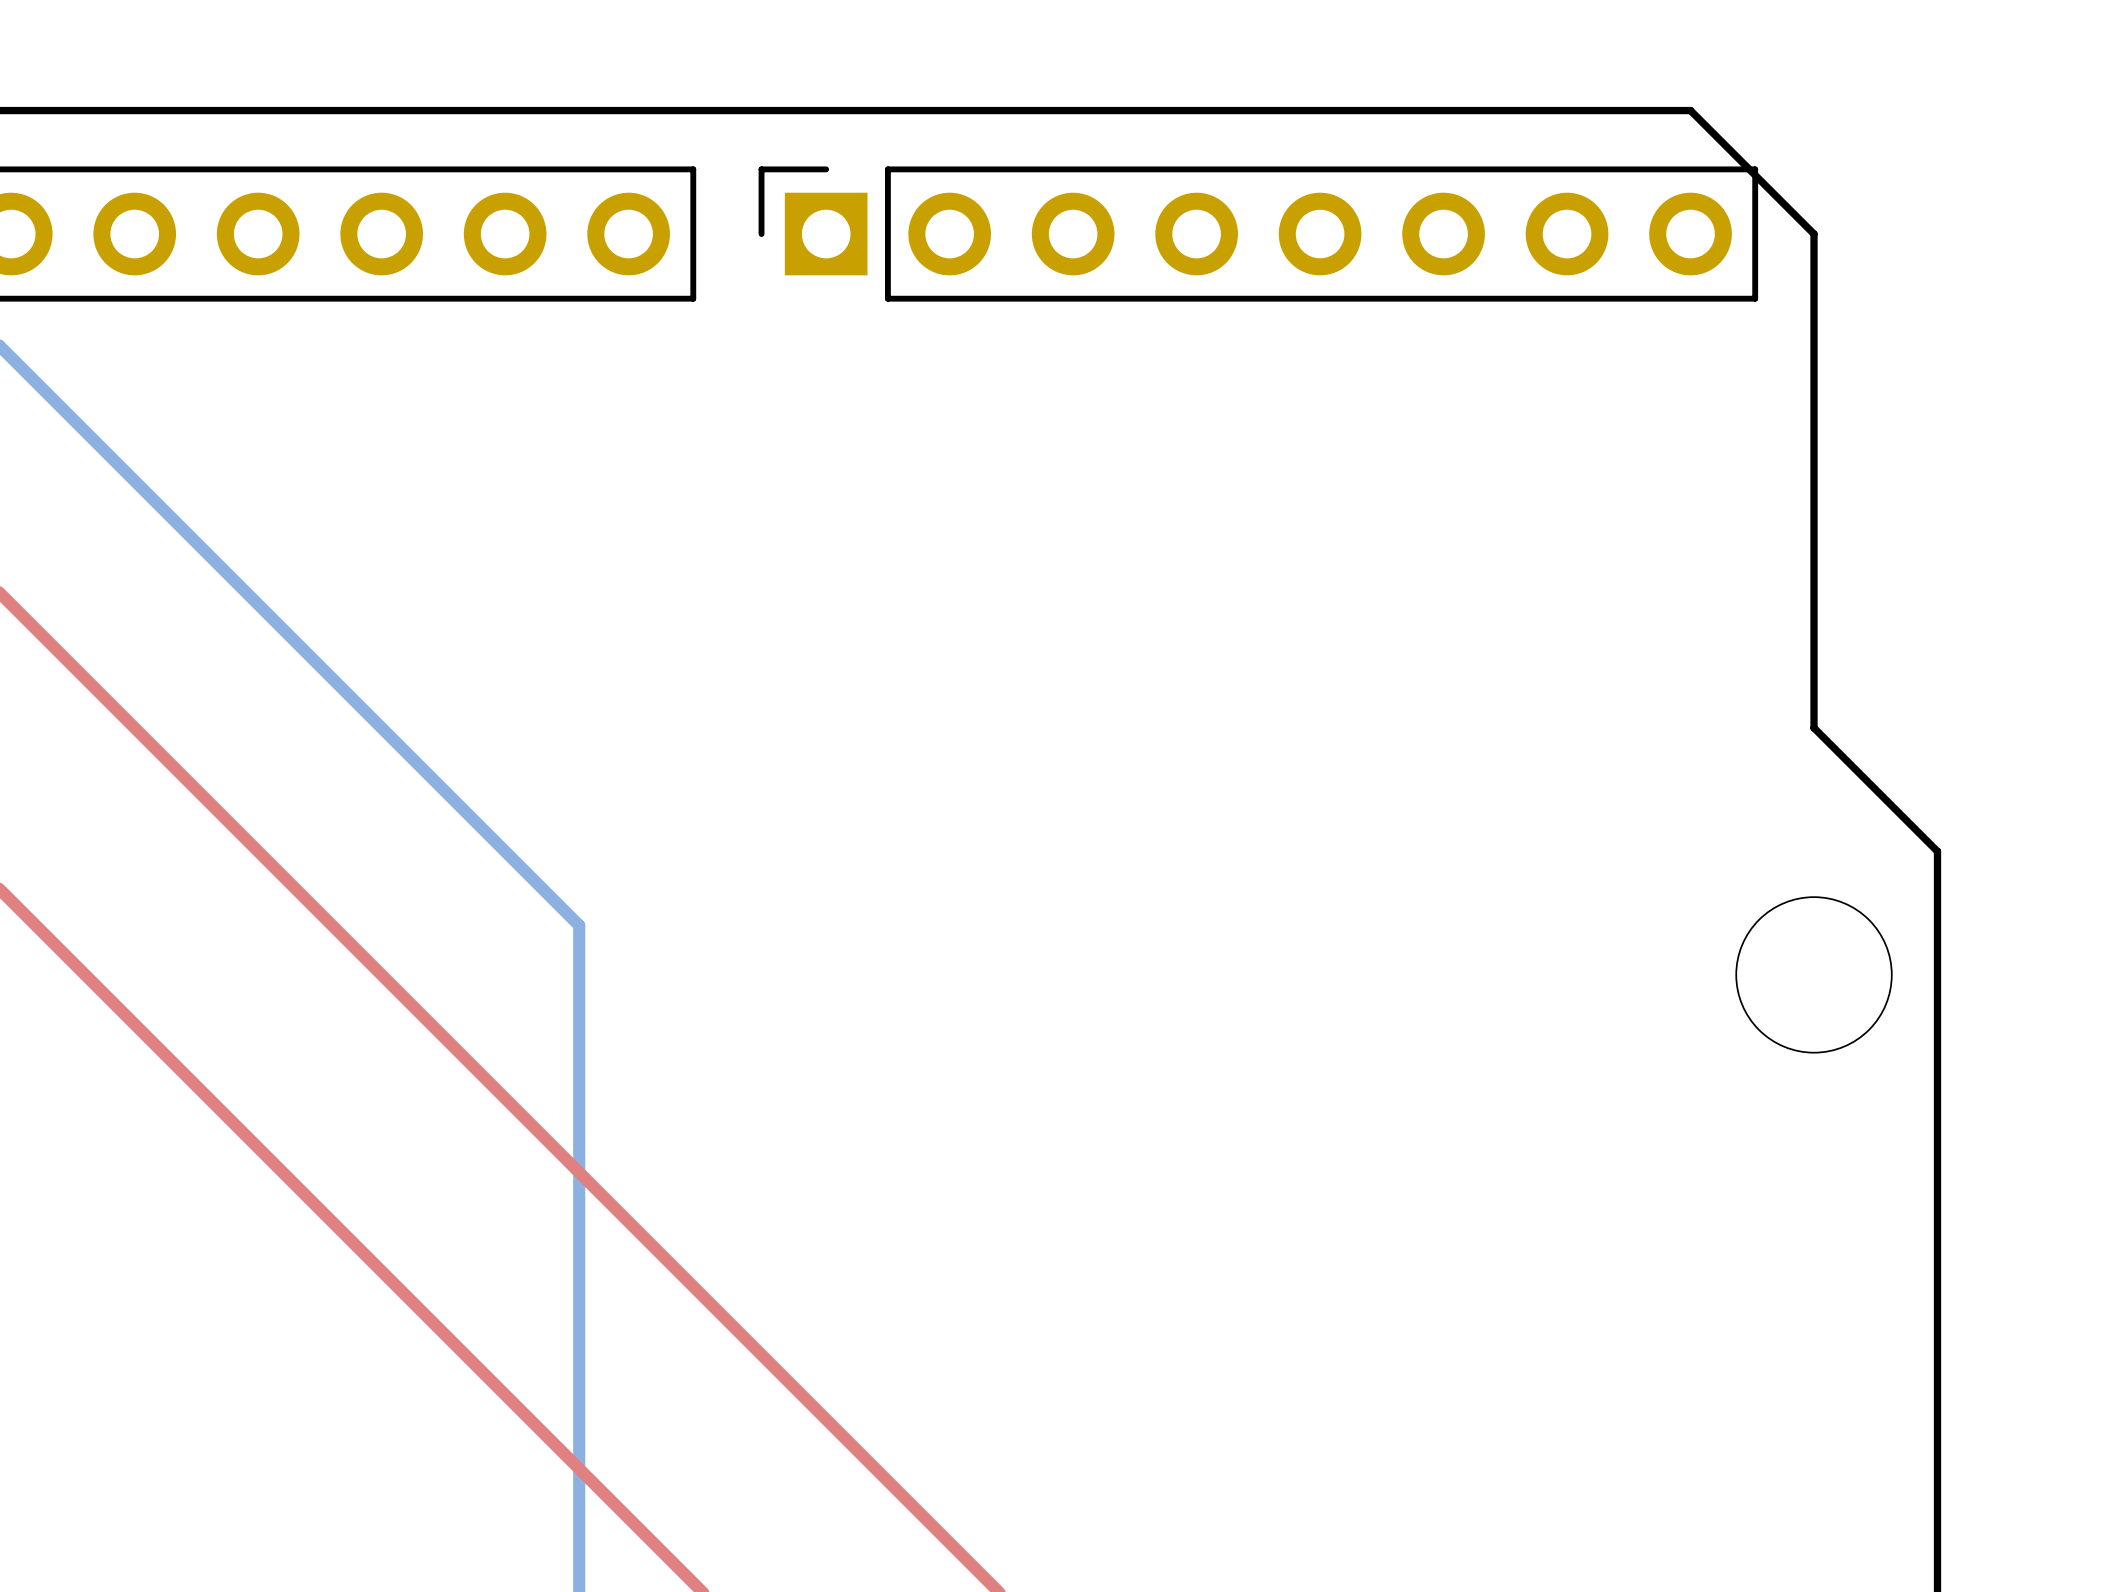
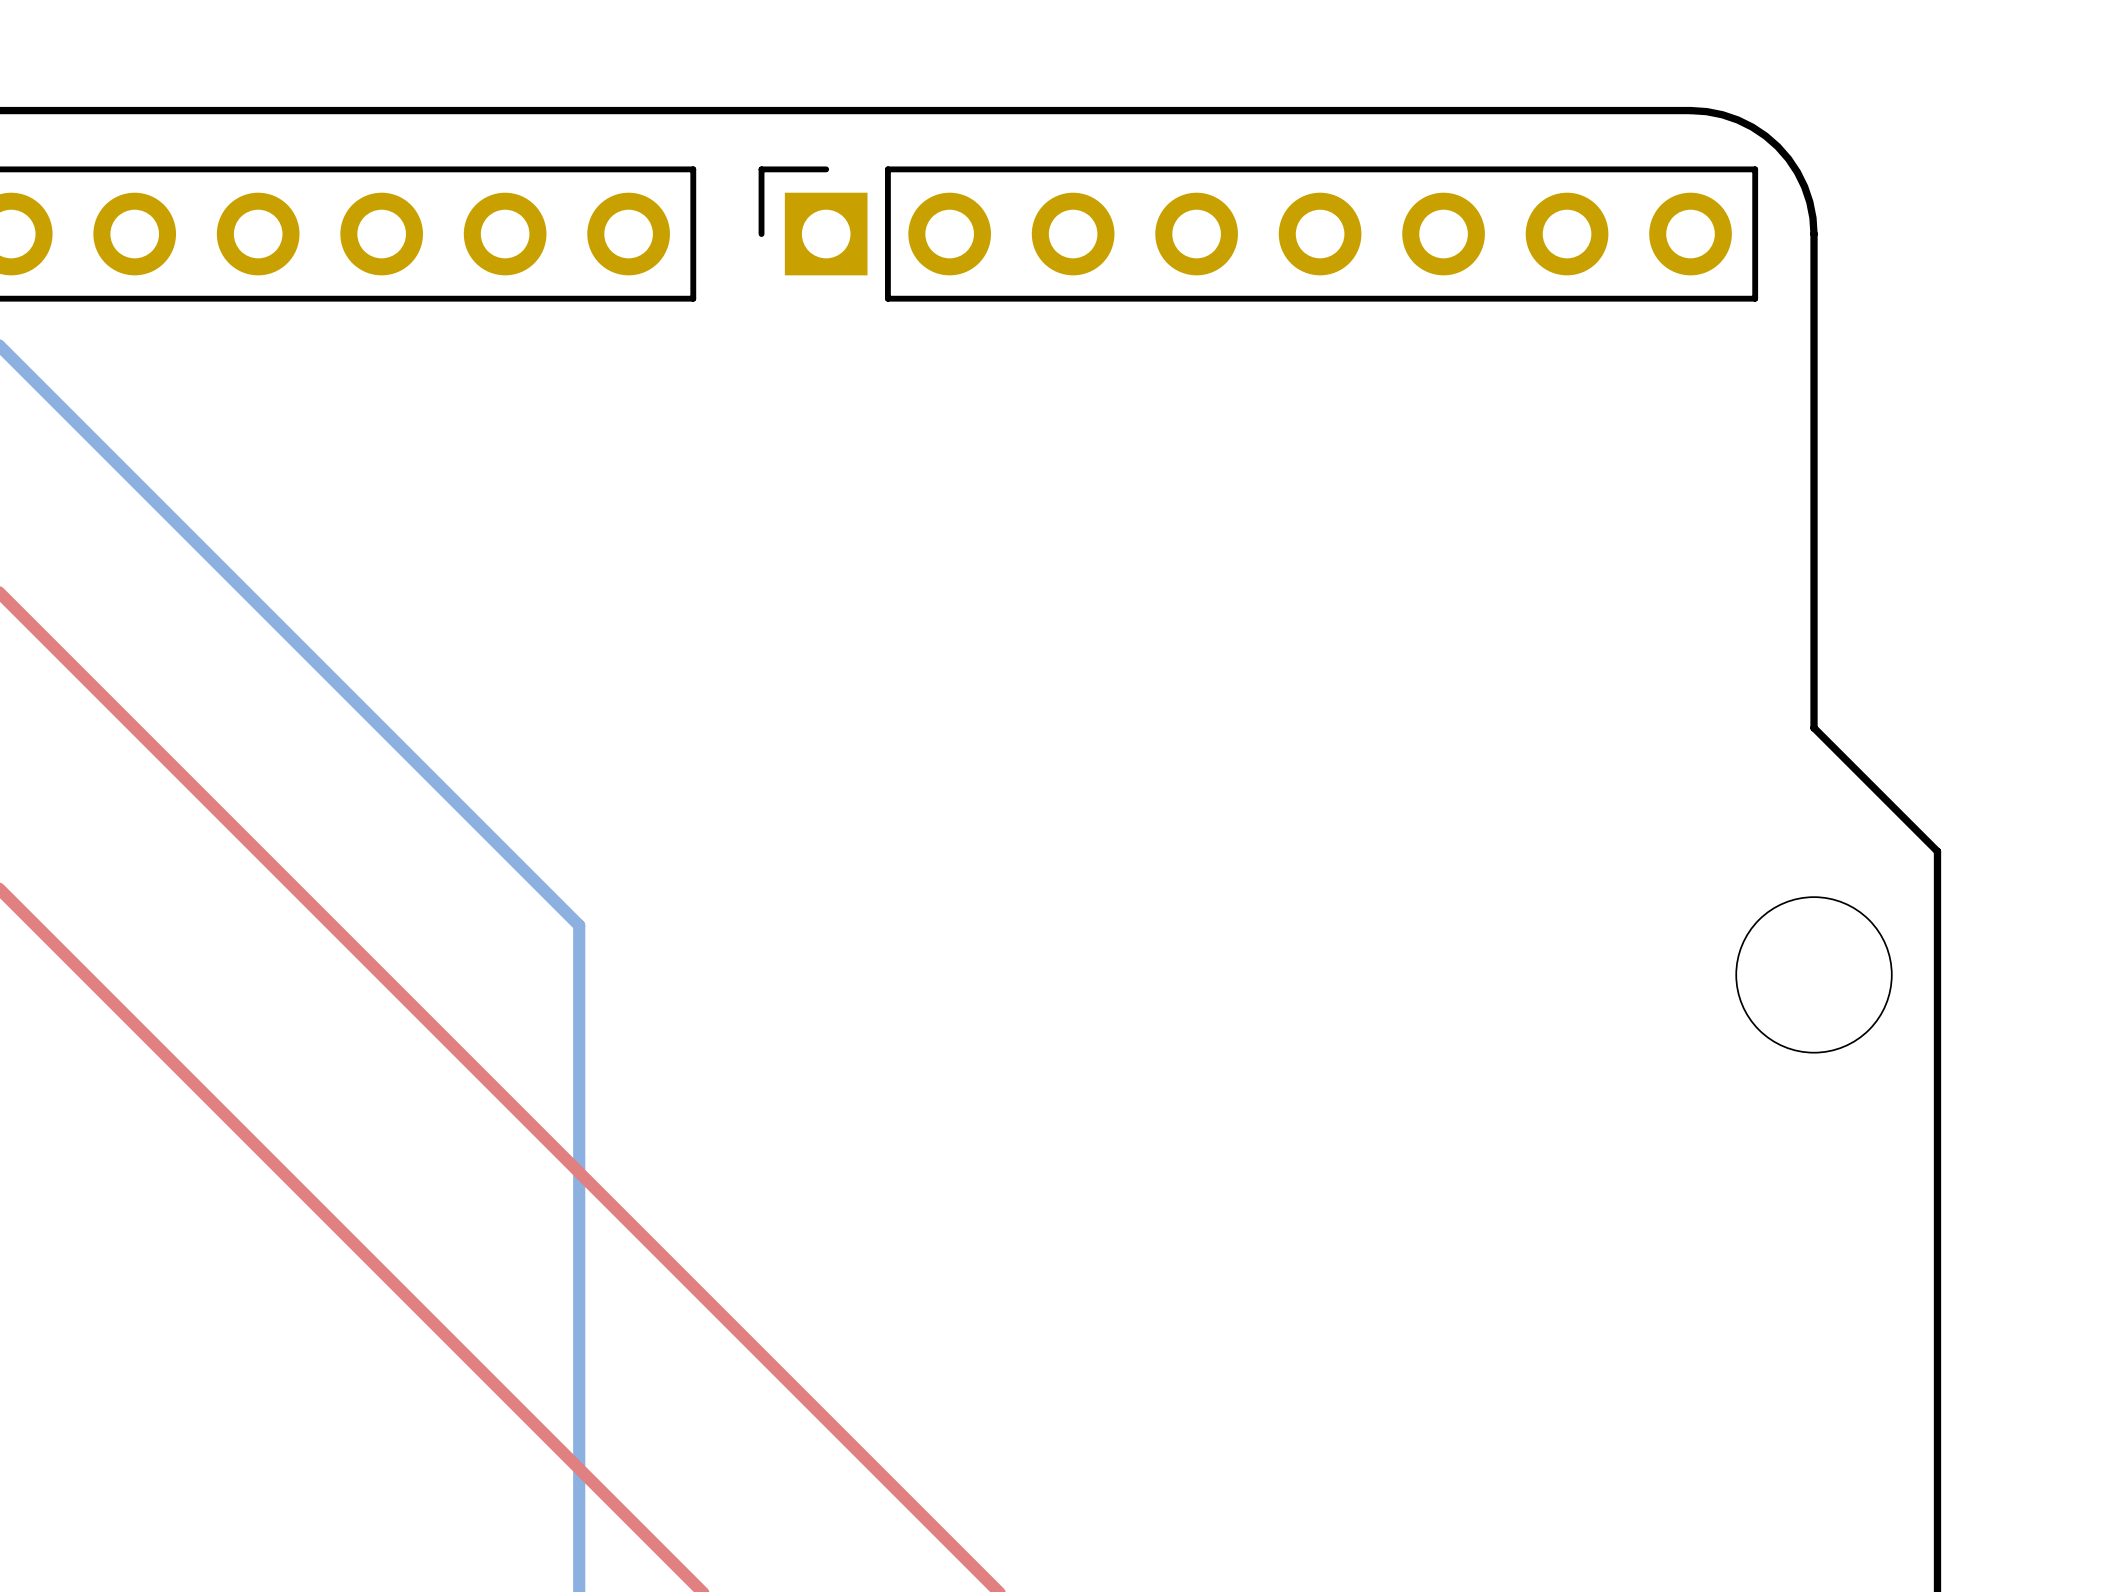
board edge: (1690, 110) (1814, 234) -> (1690, 110) (1722, 114) (1737, 119) (1765, 136) (1777, 146) (1788, 158) (1804, 186) (1809, 202) (1814, 234)

